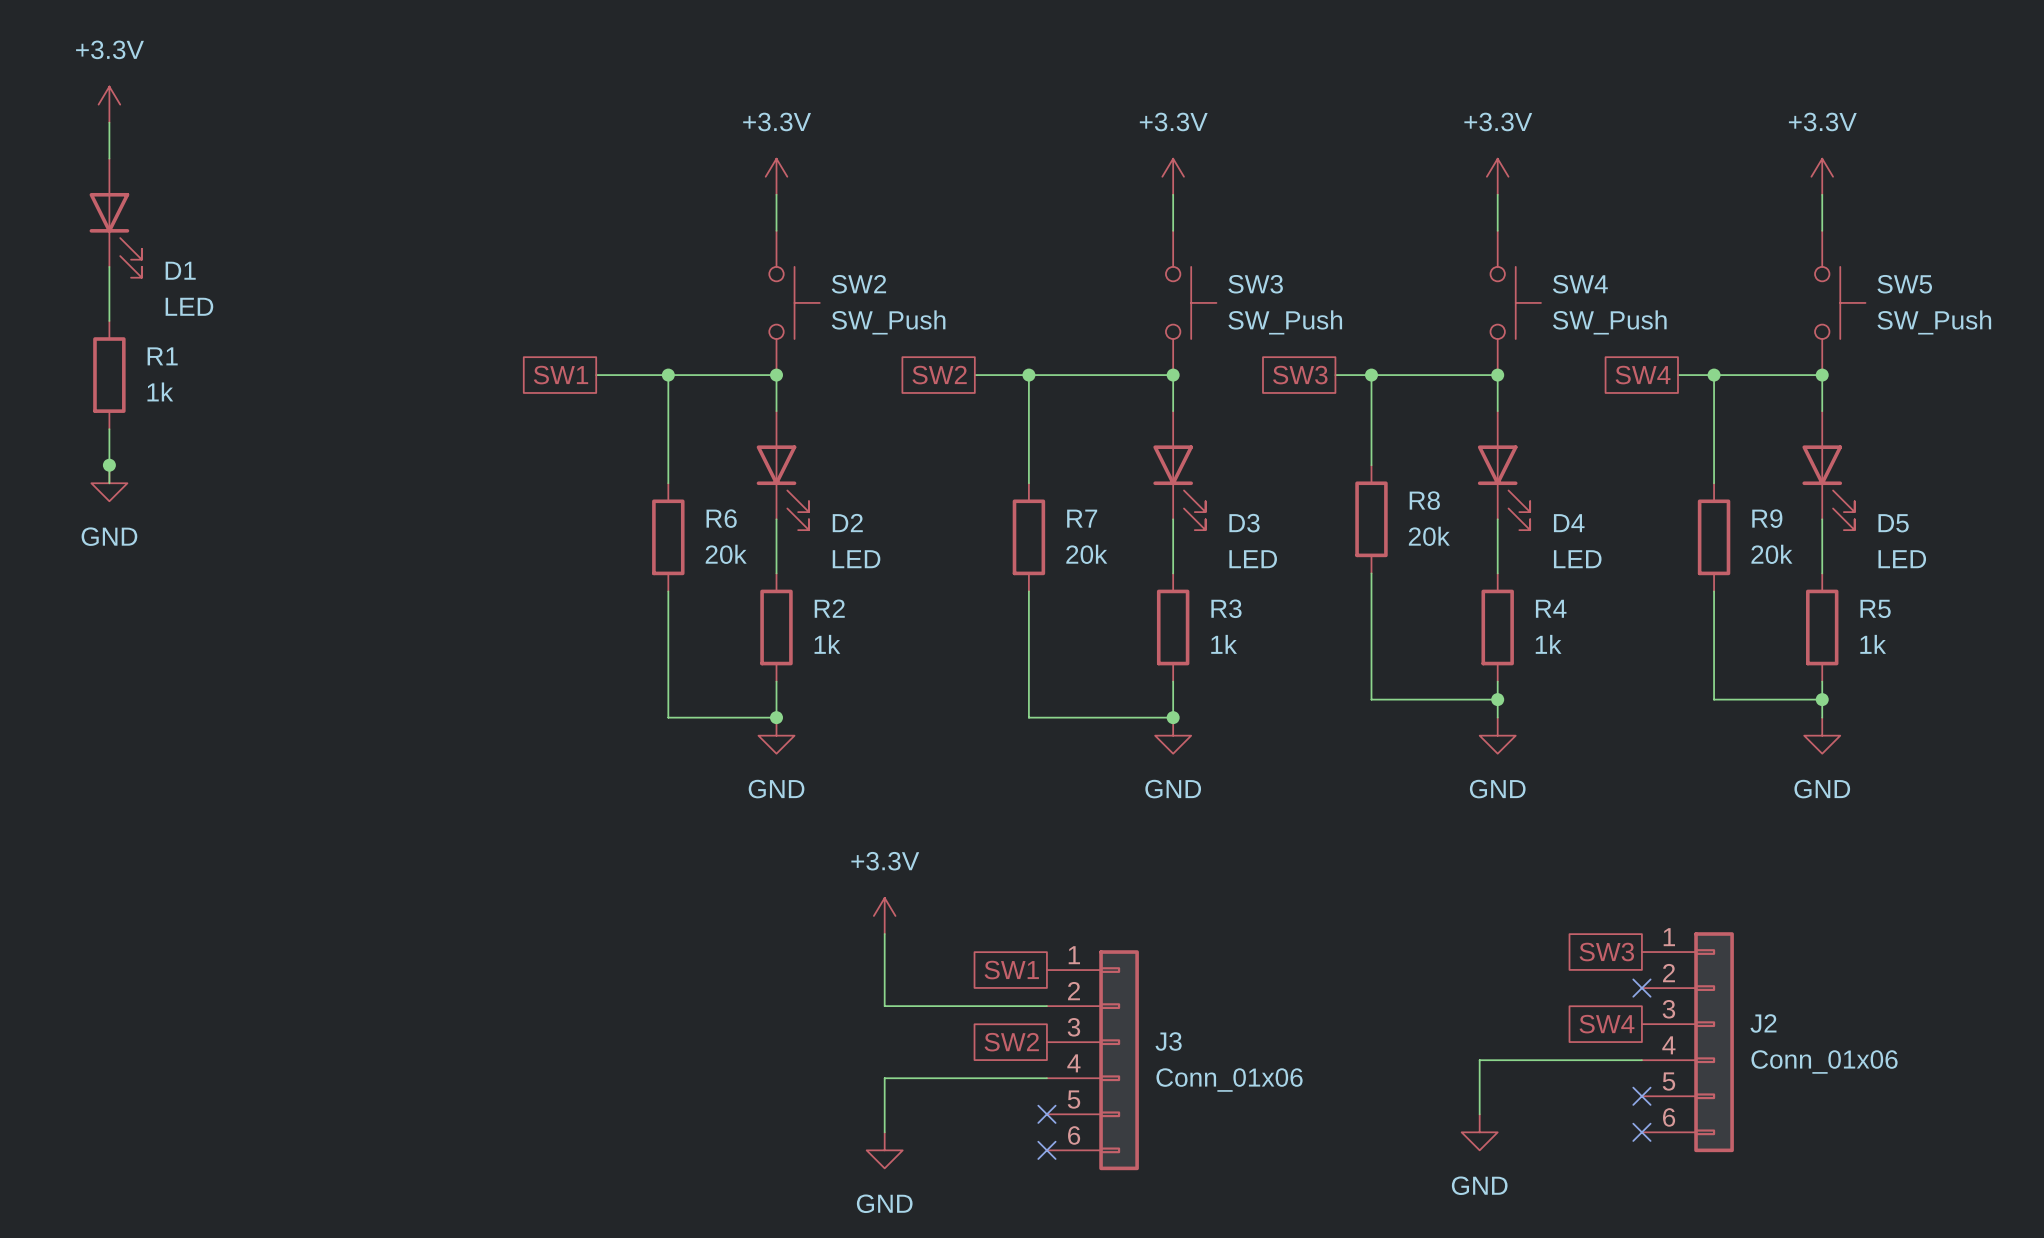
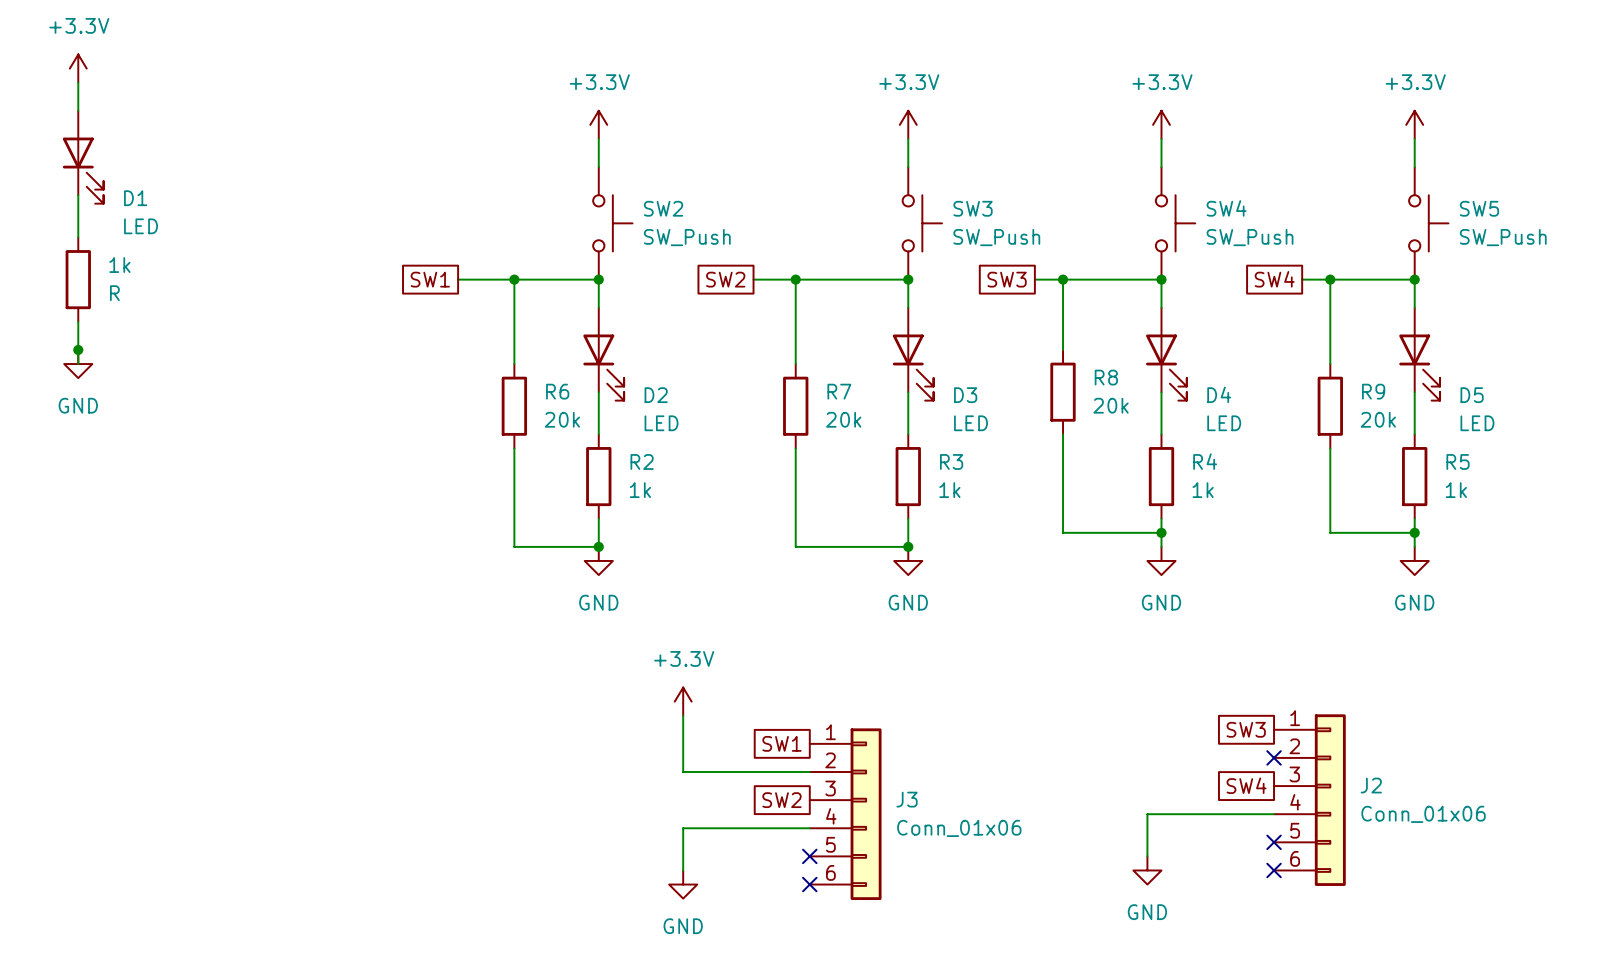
R1 name: R1 (162, 356) -> 1k (119, 265)
R1 value: 1k (160, 391) -> R (114, 293)

